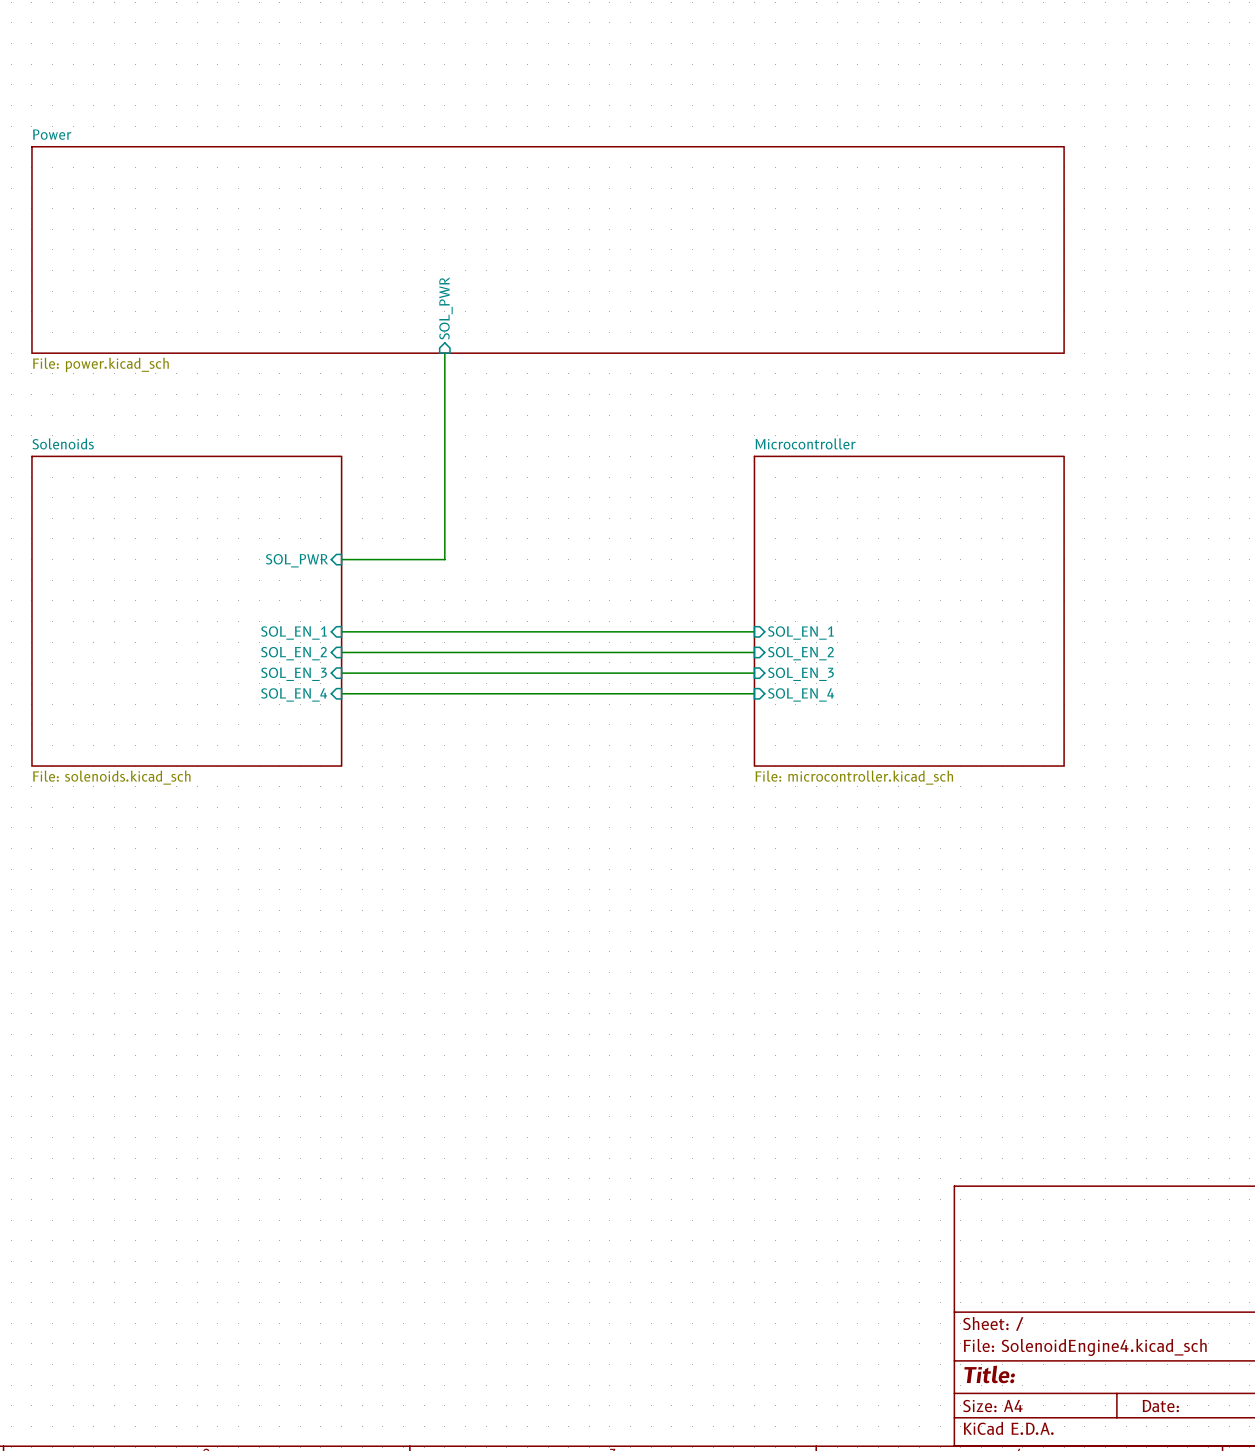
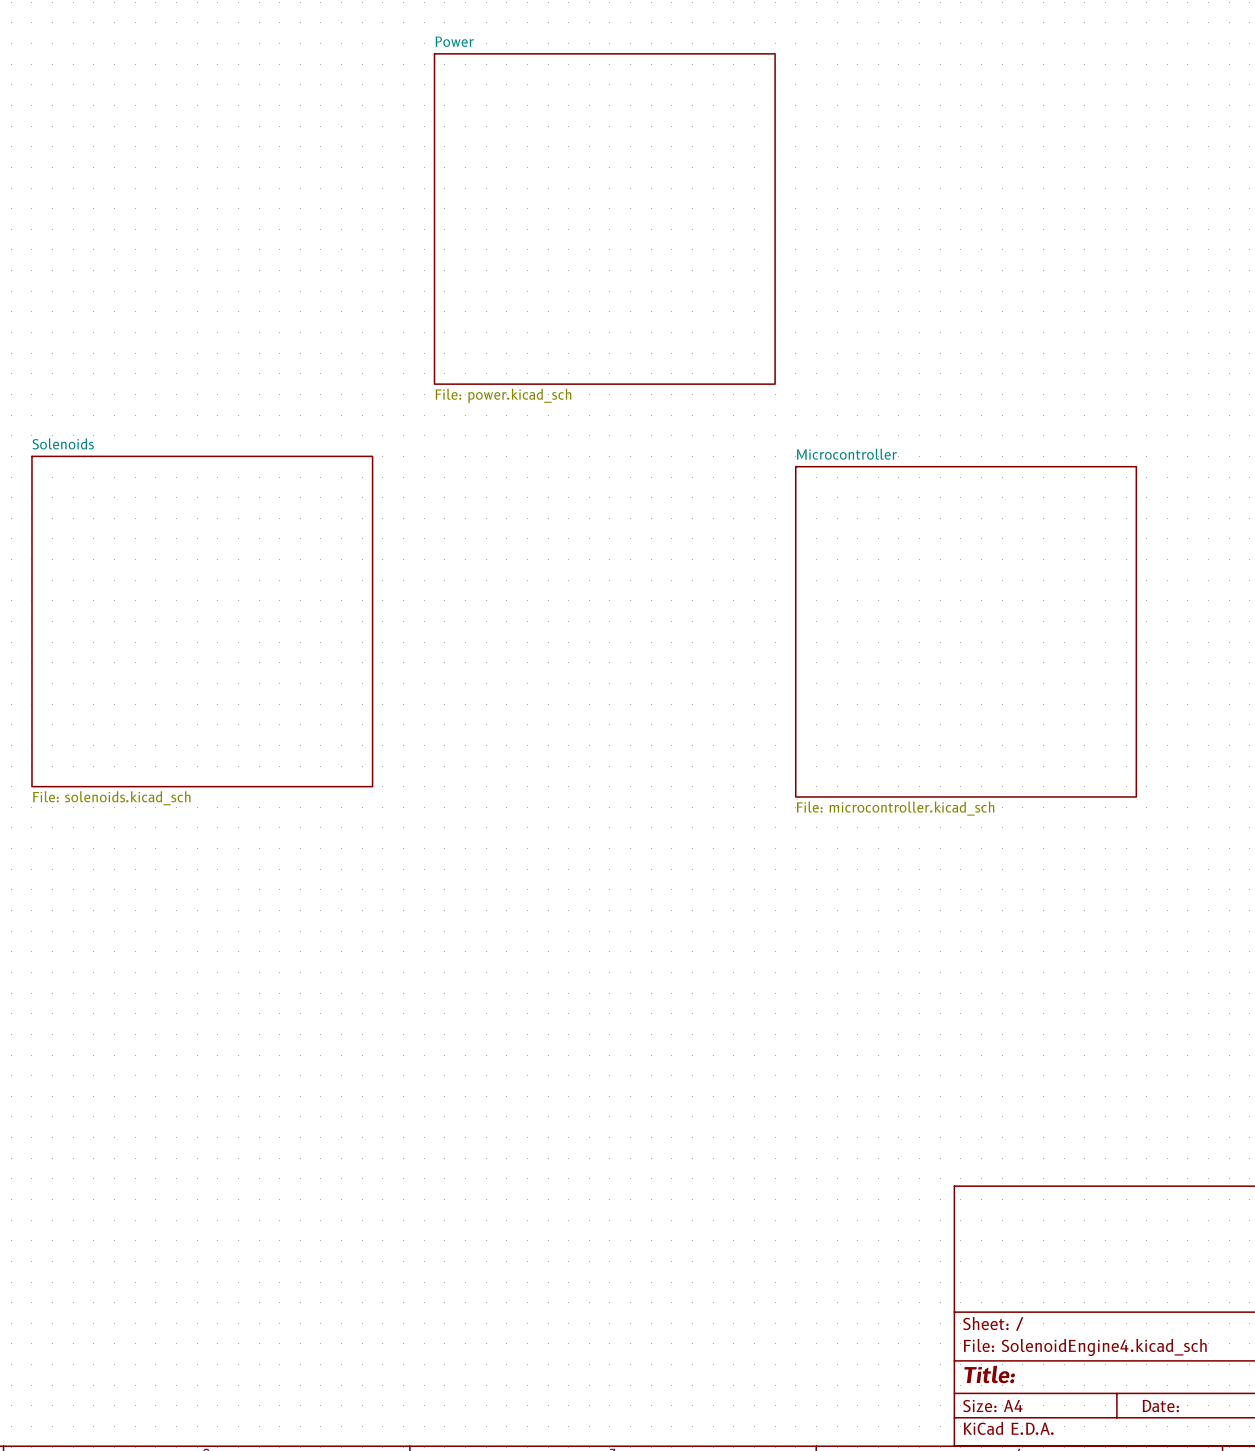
sheet Power: none -> File: power.kicad_sch (604, 219)
sheet Power: File: power.kicad_sch (548, 249) -> none
sheet pin: SOL_PWR (445, 308) -> none
wire: (444, 353) (444, 559) (341, 559) -> none
sheet pin: SOL_PWR (296, 560) -> none
sheet Solenoids: File: solenoids.kicad_sch (186, 611) -> none
sheet Microcontroller: File: microcontroller.kicad_sch (909, 611) -> none
sheet Solenoids: none -> File: solenoids.kicad_sch (202, 621)
wire: (341, 631) (754, 631) -> none
sheet Microcontroller: none -> File: microcontroller.kicad_sch (966, 631)
sheet pin: SOL_EN_1 (293, 633) -> none
sheet pin: SOL_EN_1 (800, 633) -> none
wire: (341, 652) (754, 652) -> none
sheet pin: SOL_EN_2 (294, 653) -> none
sheet pin: SOL_EN_2 (800, 653) -> none
wire: (341, 673) (754, 673) -> none
sheet pin: SOL_EN_3 (294, 674) -> none
sheet pin: SOL_EN_3 (800, 674) -> none
wire: (341, 693) (754, 693) -> none
sheet pin: SOL_EN_4 (294, 694) -> none
sheet pin: SOL_EN_4 (801, 694) -> none

